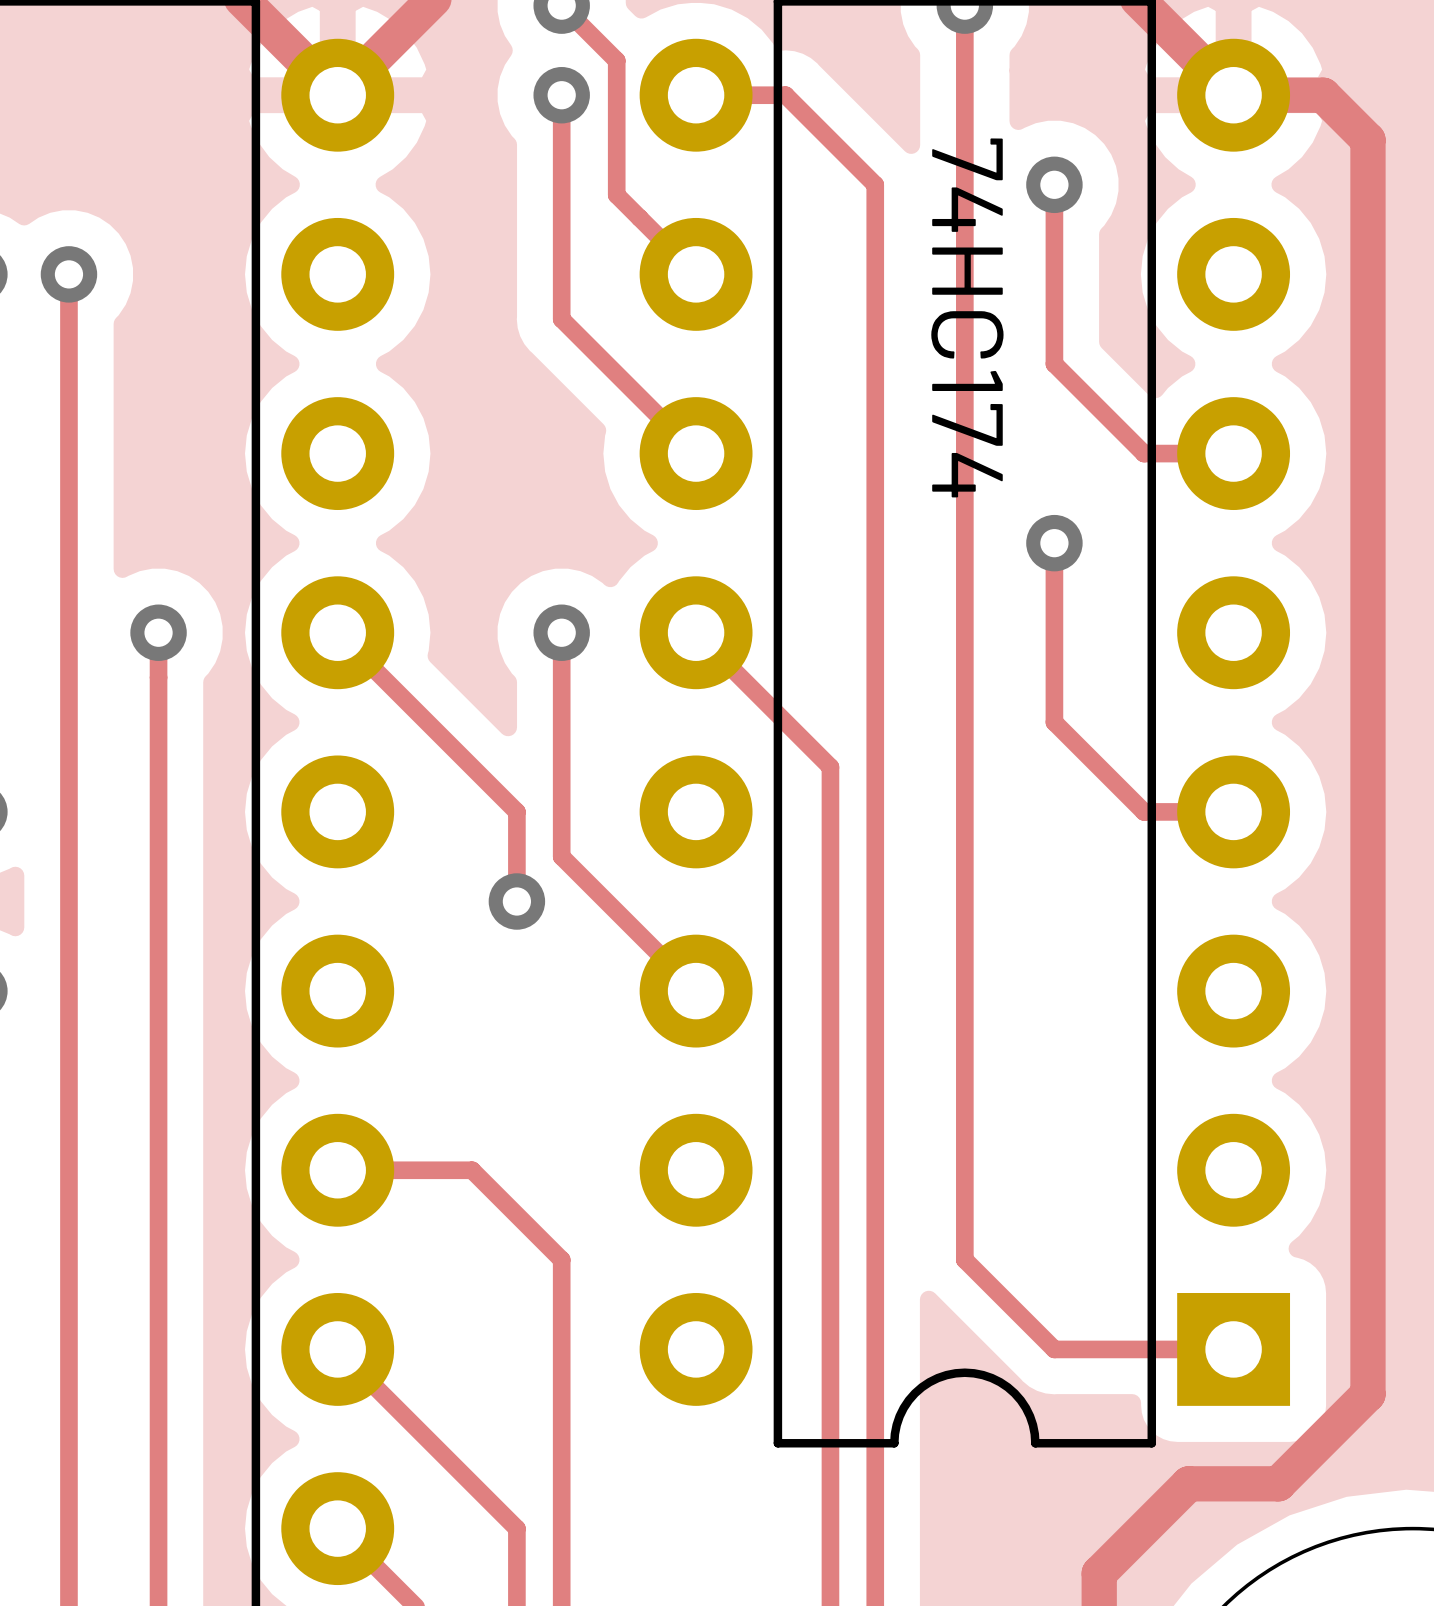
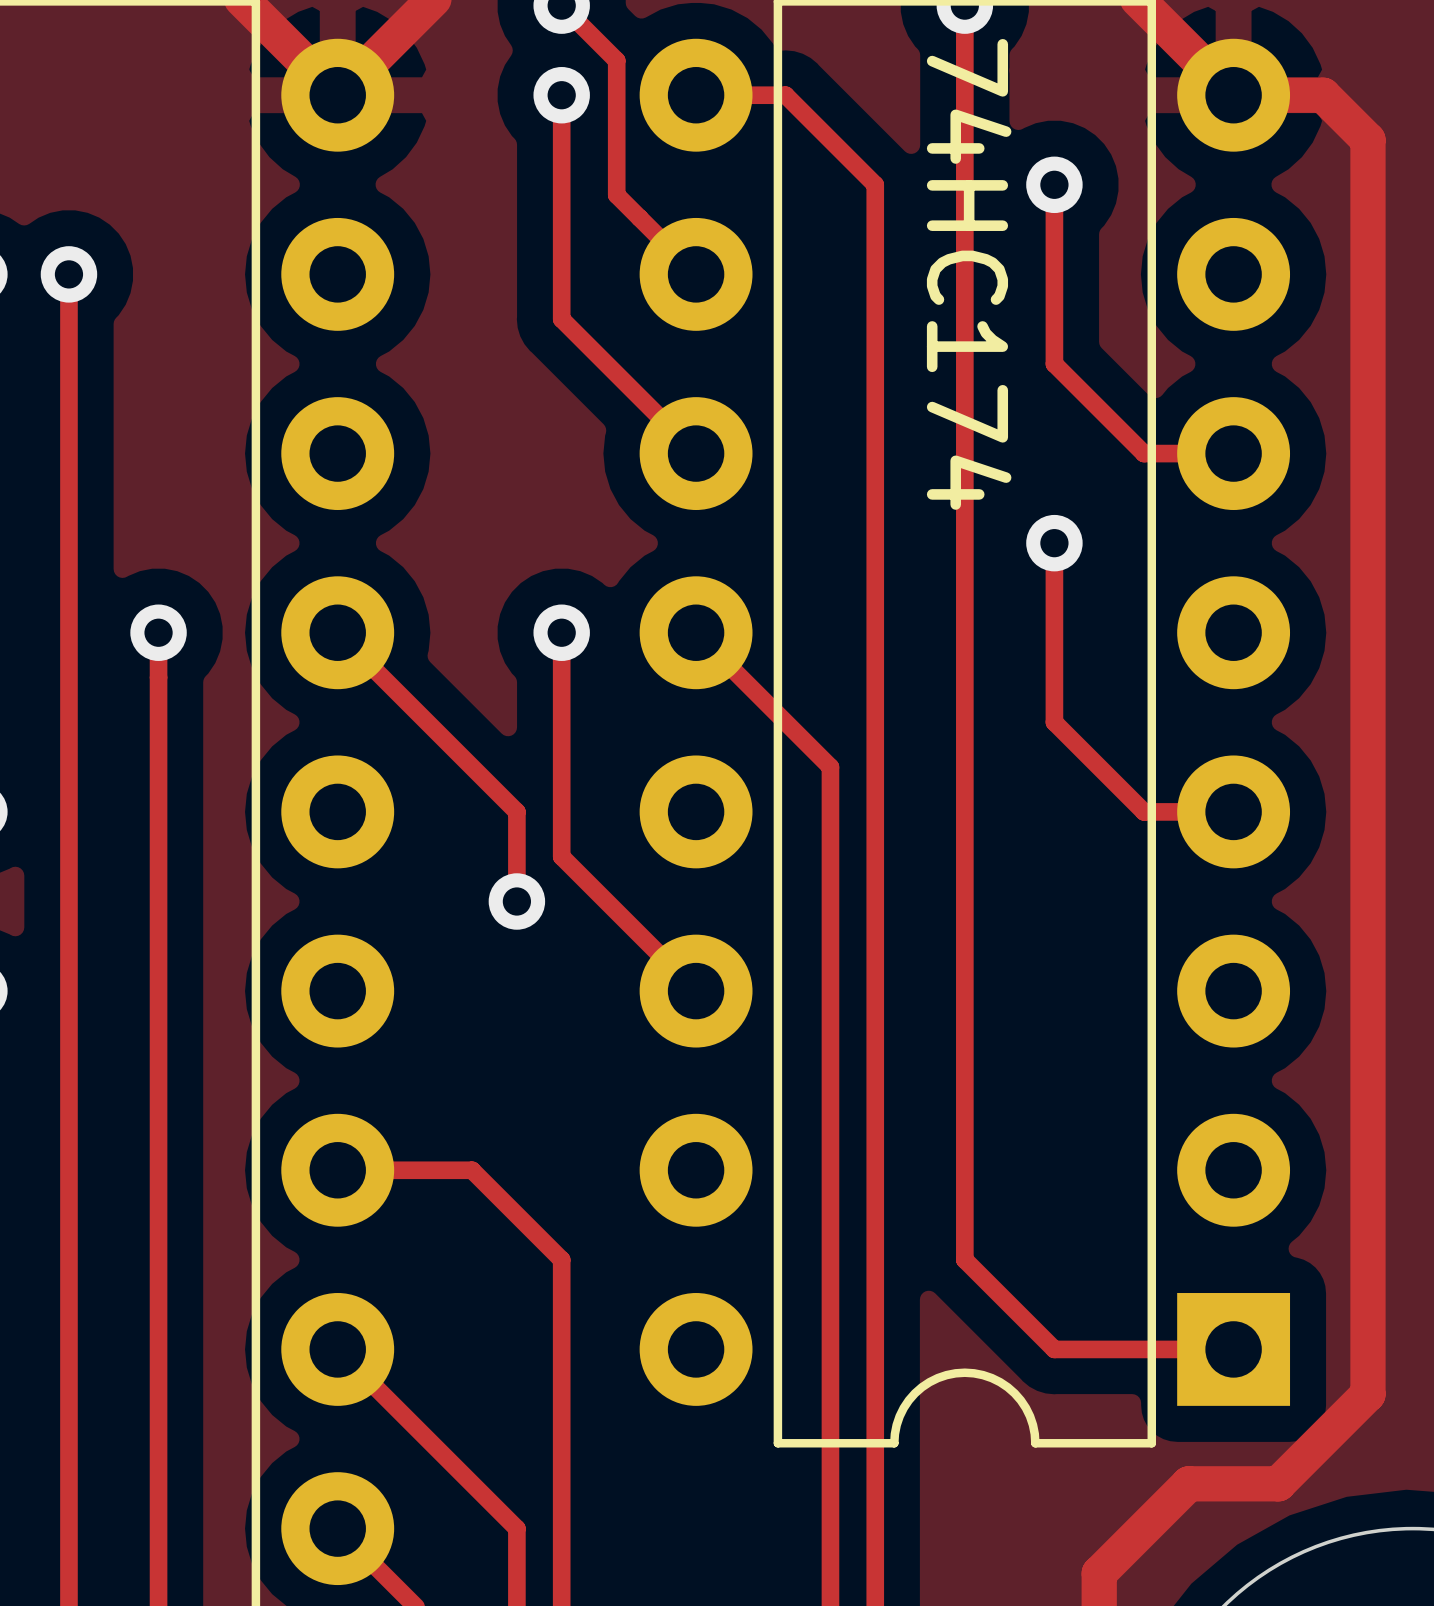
part value position: 74HC174 (967, 317) -> 74HC174 (969, 274)

